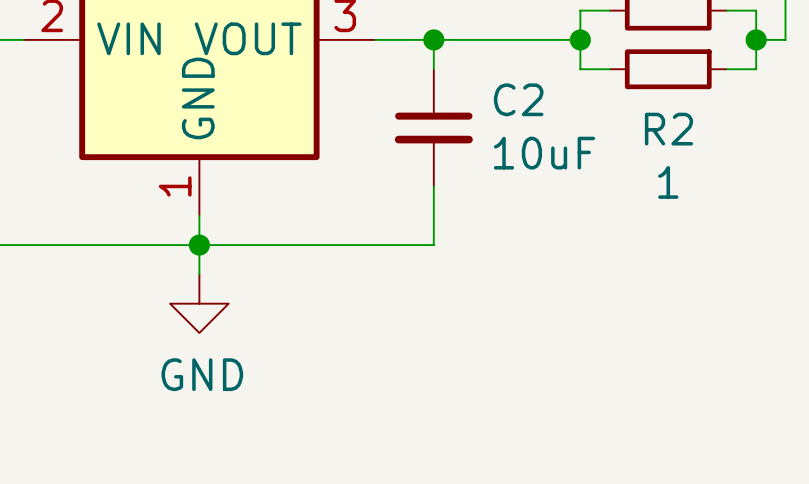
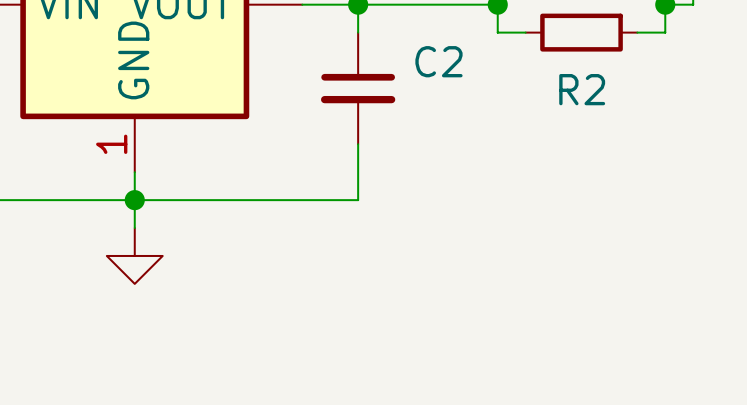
C2 value: 10uF (544, 153) -> none
R2 value: 1 (668, 182) -> none
power symbol text: GND (202, 374) -> none

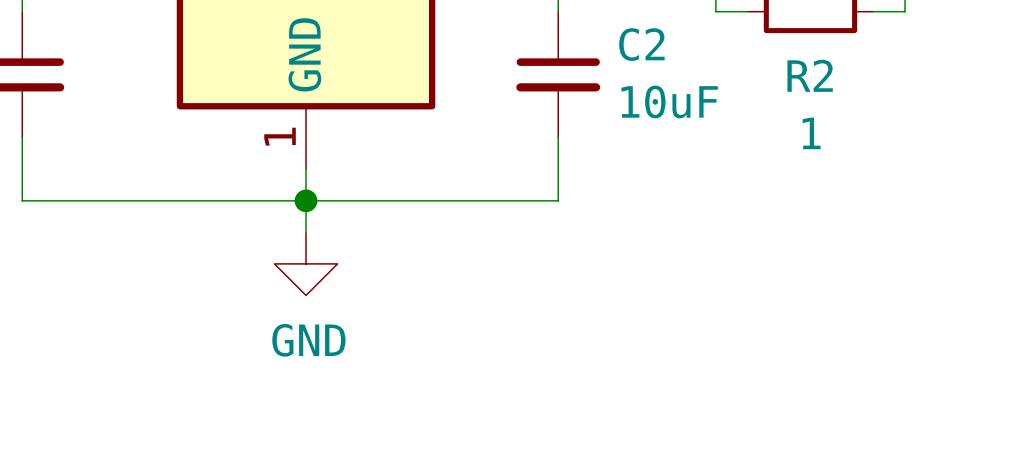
C2 value: none -> 10uF (669, 101)
R2 value: none -> 1 (811, 133)
power symbol text: none -> GND (308, 340)

